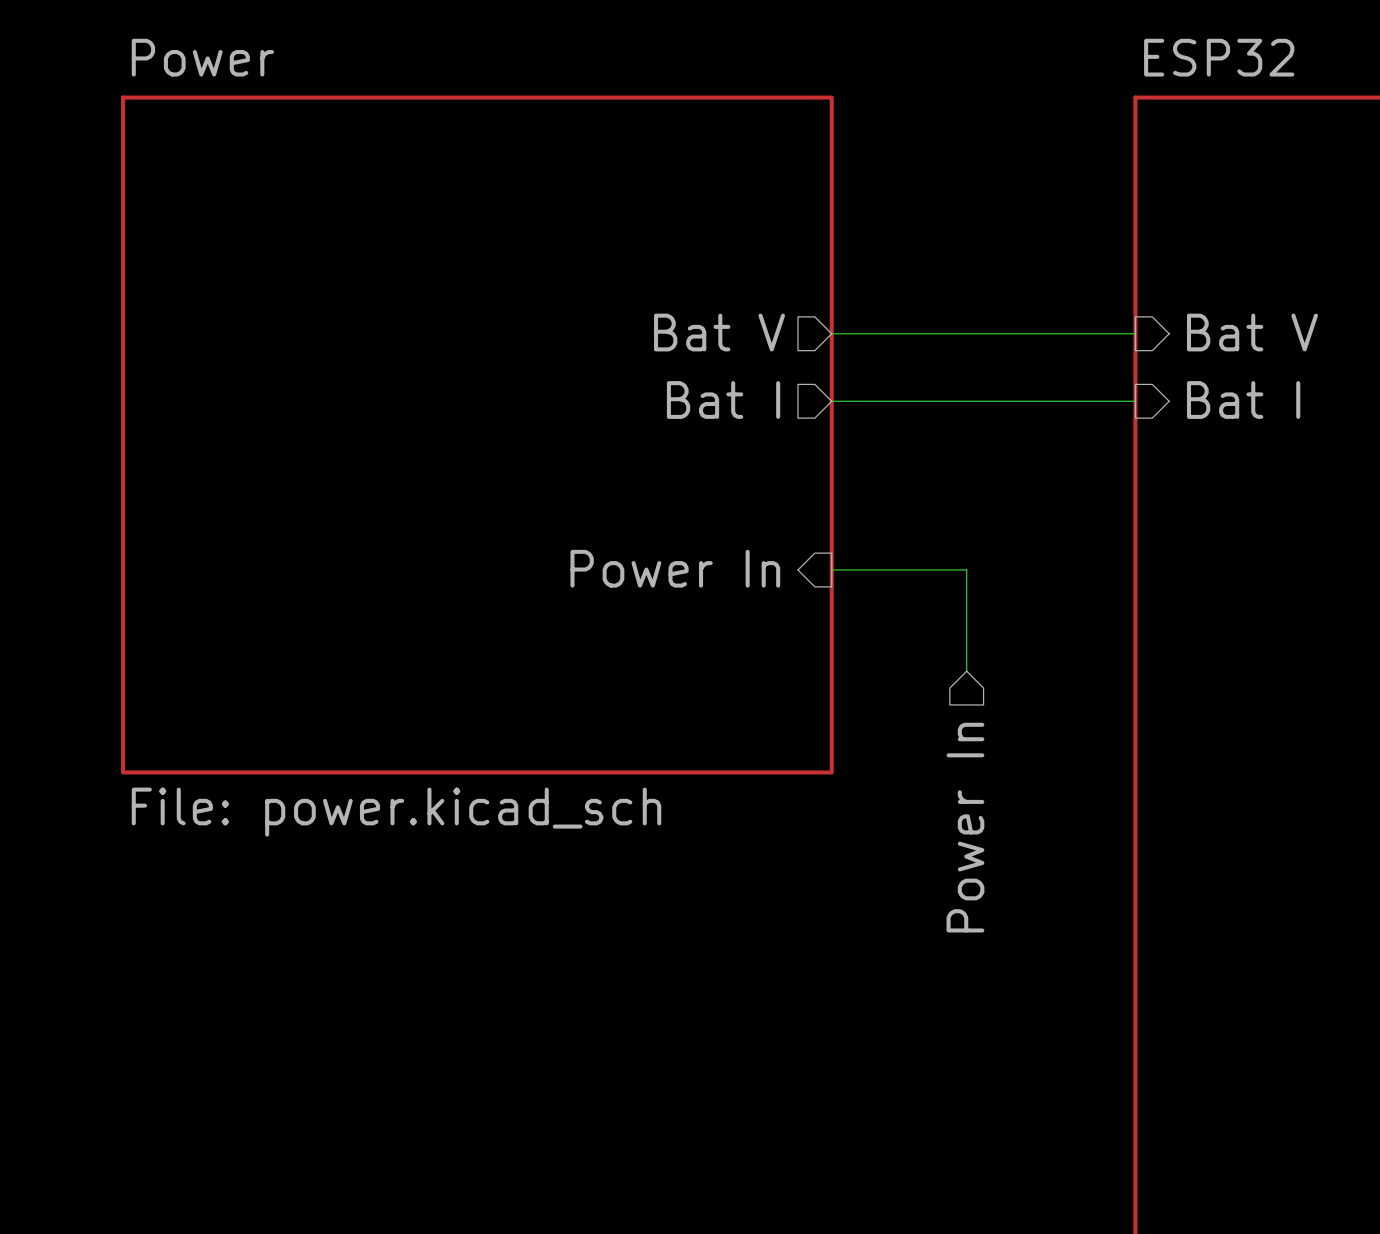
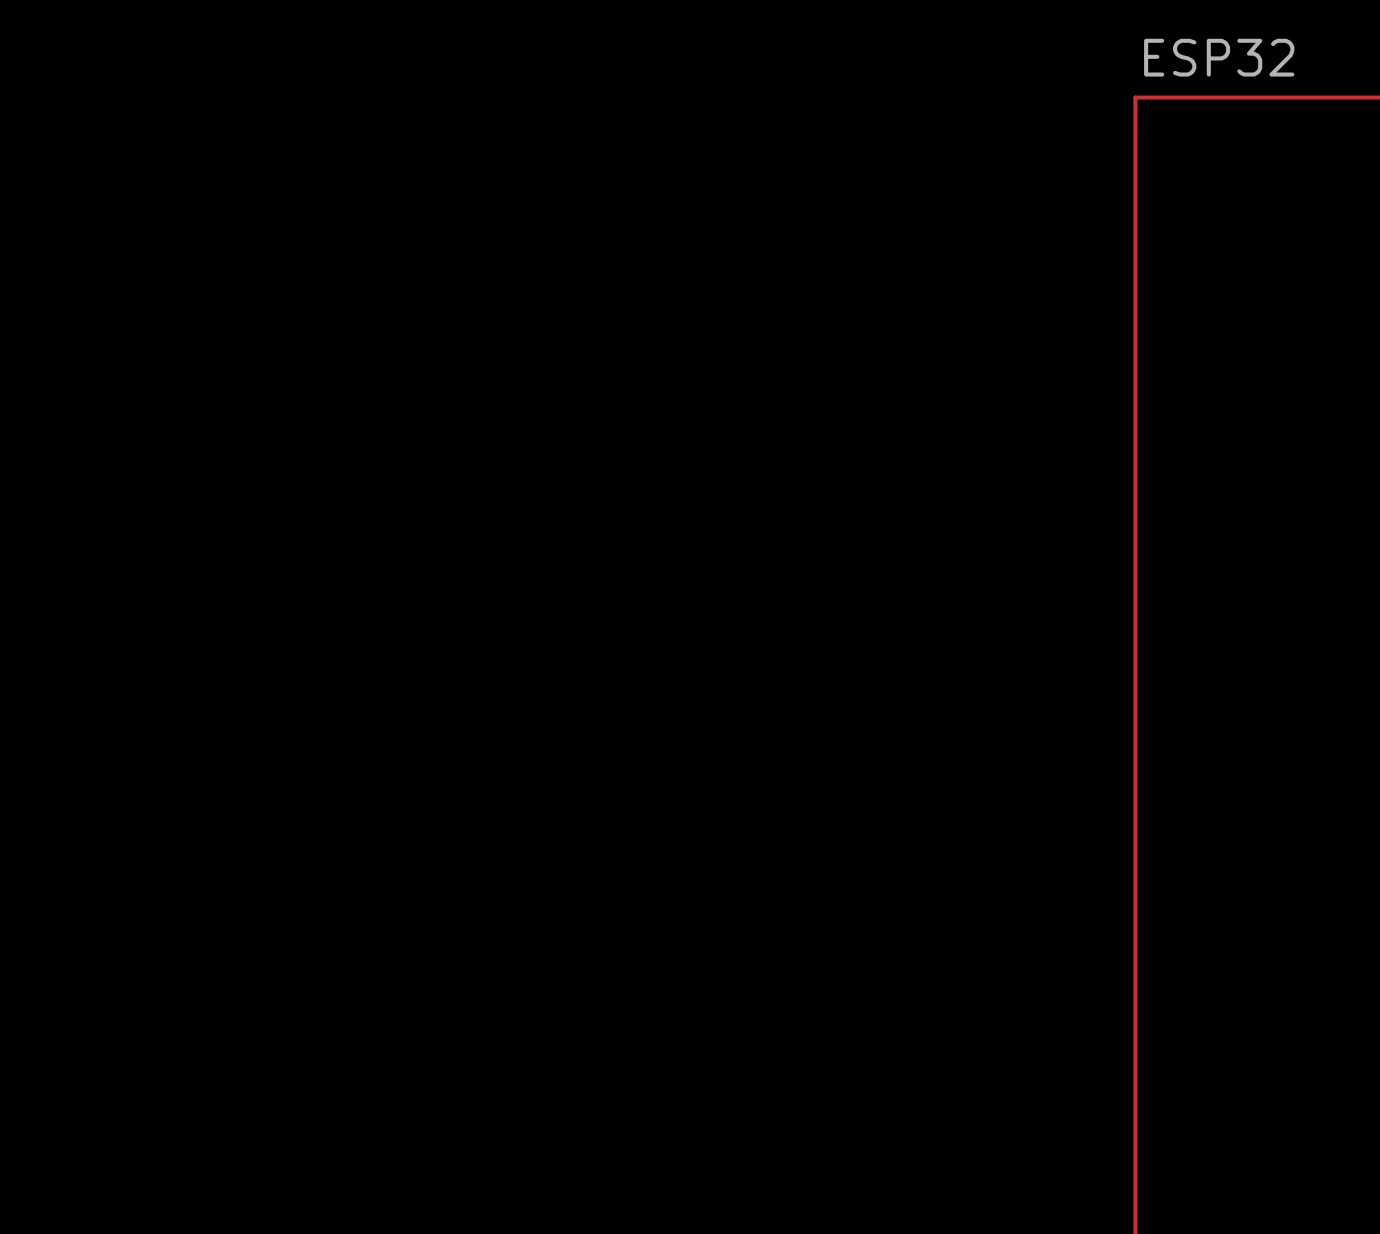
sheet pin: Bat V (719, 332) -> none
sheet pin: Bat V (1252, 332) -> none
wire: (831, 333) (1135, 333) -> none
sheet pin: Bat I (723, 400) -> none
sheet pin: Bat I (1243, 400) -> none
wire: (831, 401) (1135, 401) -> none
sheet Power: File: power.kicad_sch (477, 435) -> none
sheet pin: Power In (675, 568) -> none
wire: (831, 569) (966, 569) (966, 671) -> none
hierarchical label: Power In (965, 827) -> none

